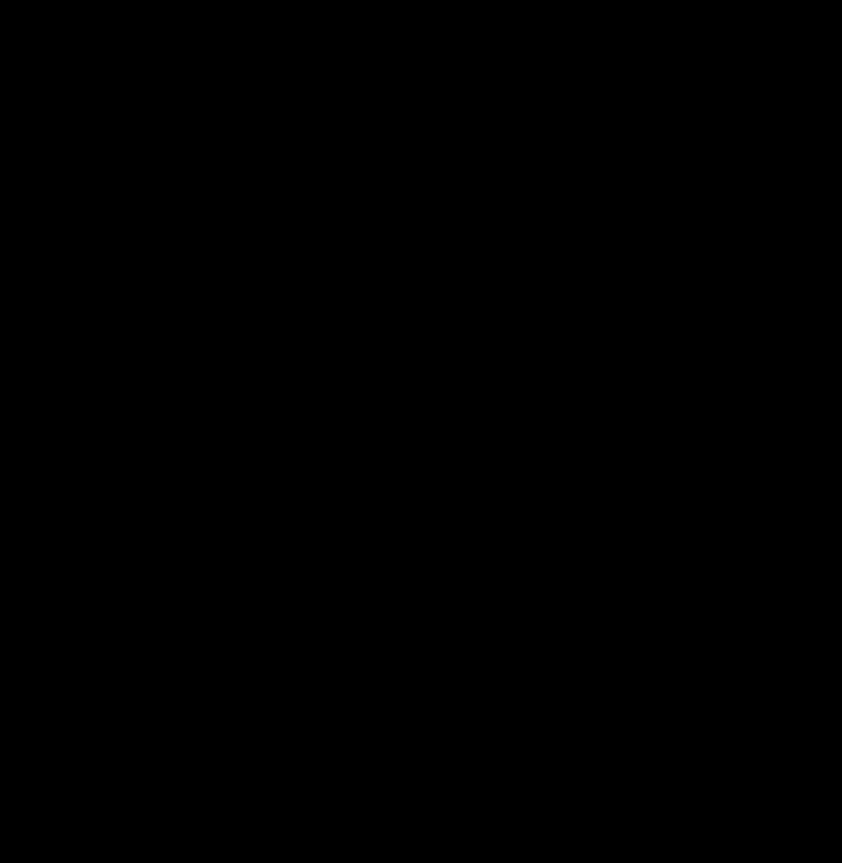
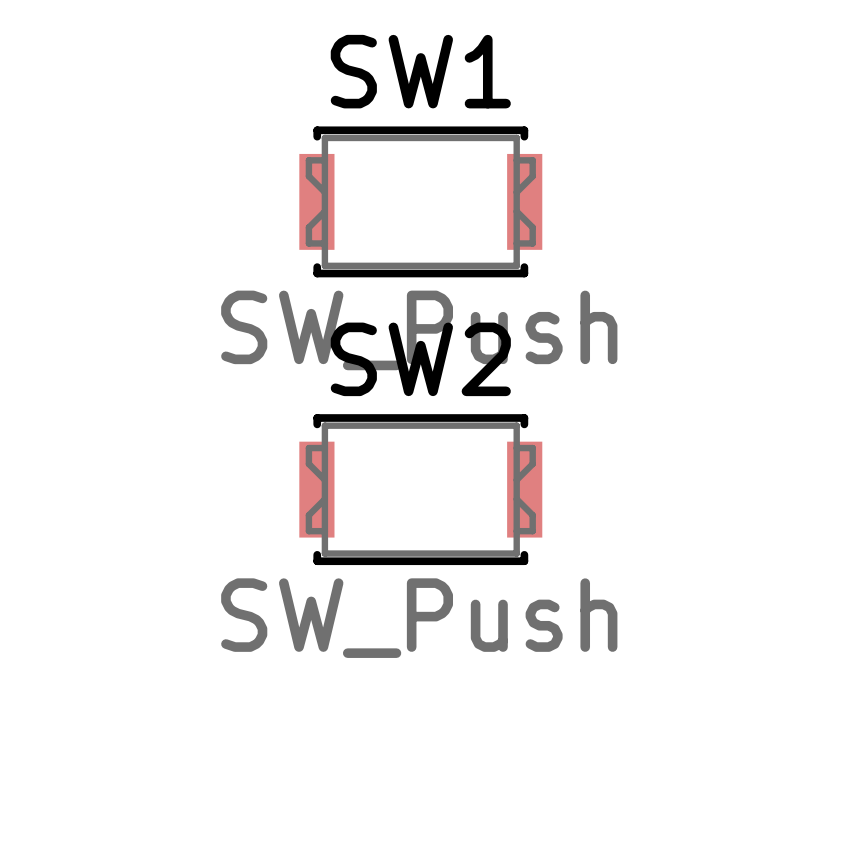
SW1: none -> SW_Push (420, 201)
SW2: none -> SW_Push (420, 489)

